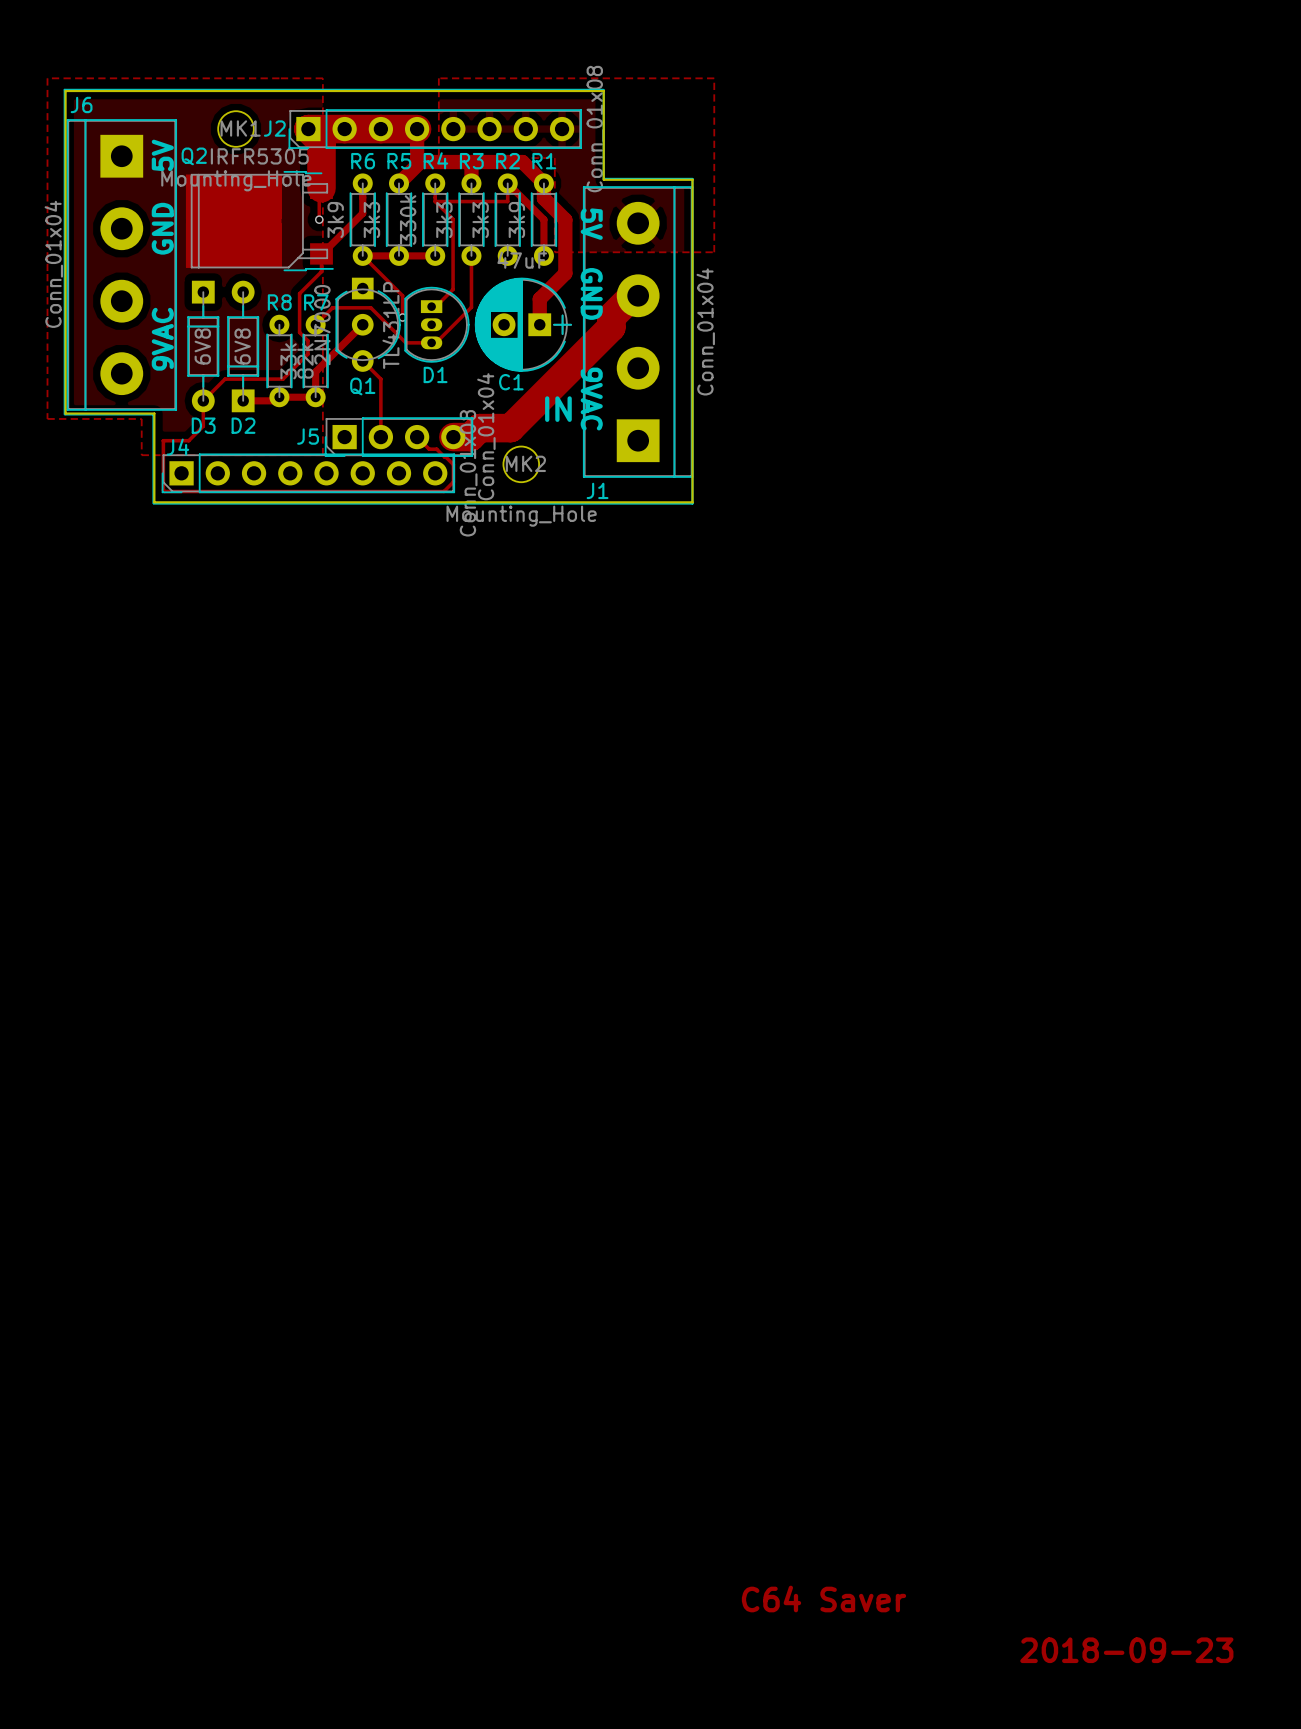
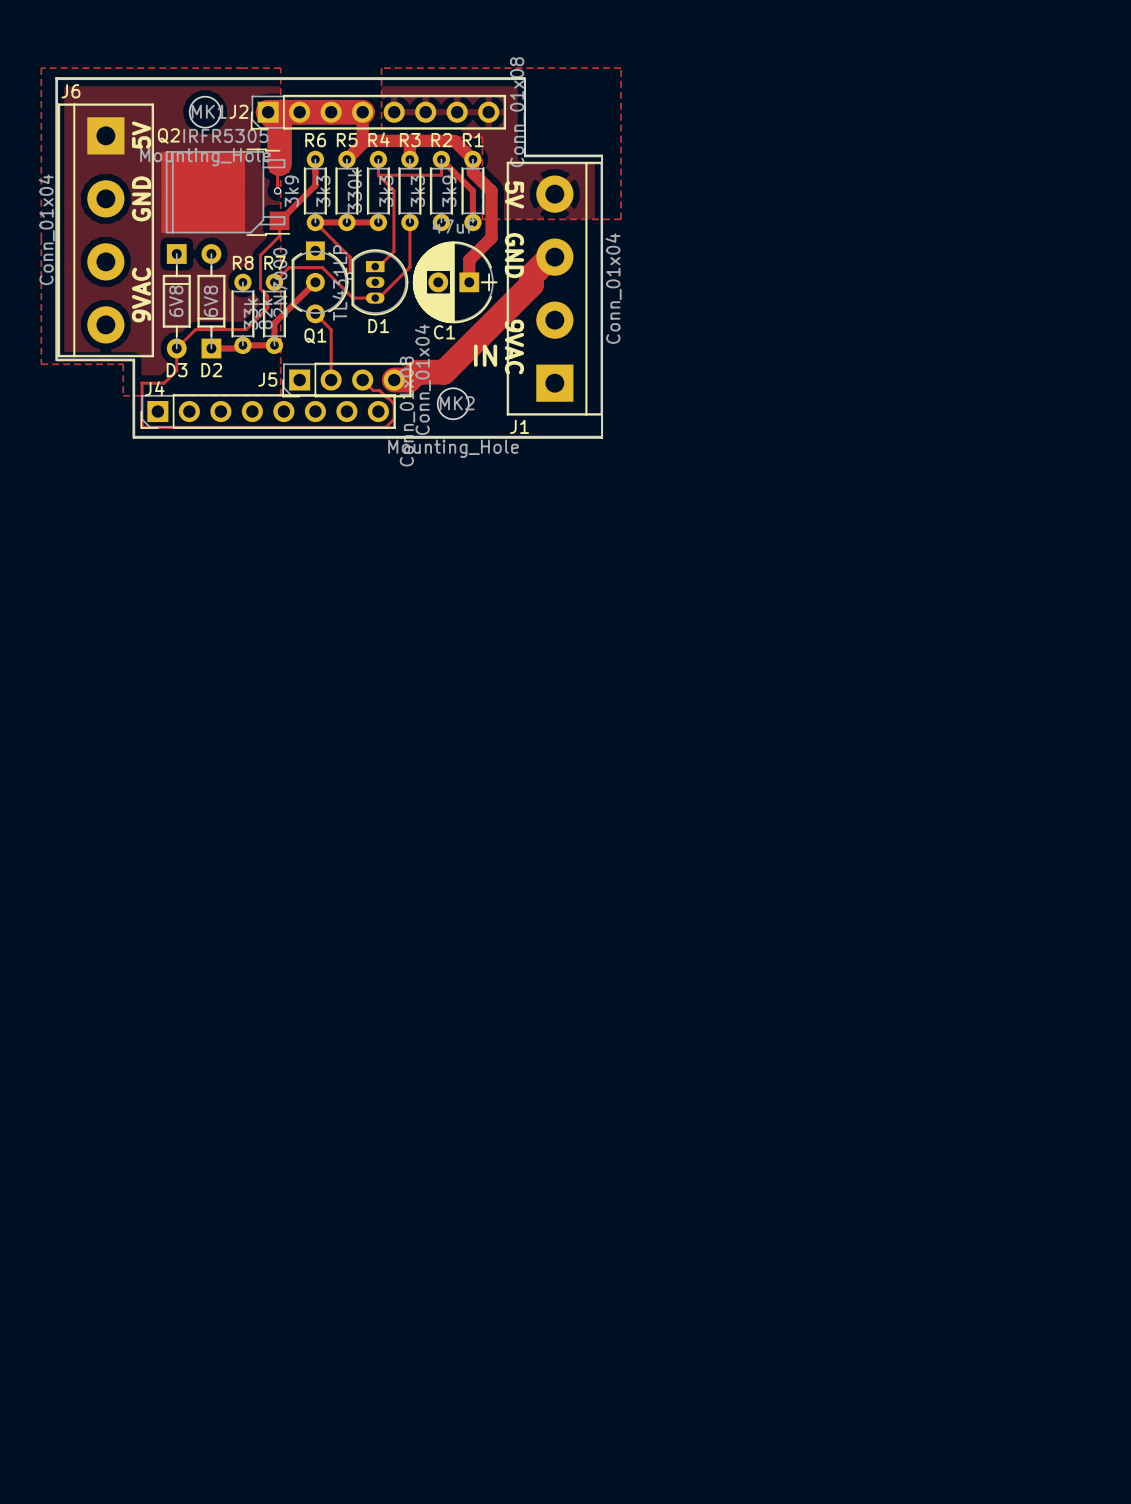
text: C64 Saver (823, 1598) -> none
text: 2018-09-23 (1126, 1650) -> none

